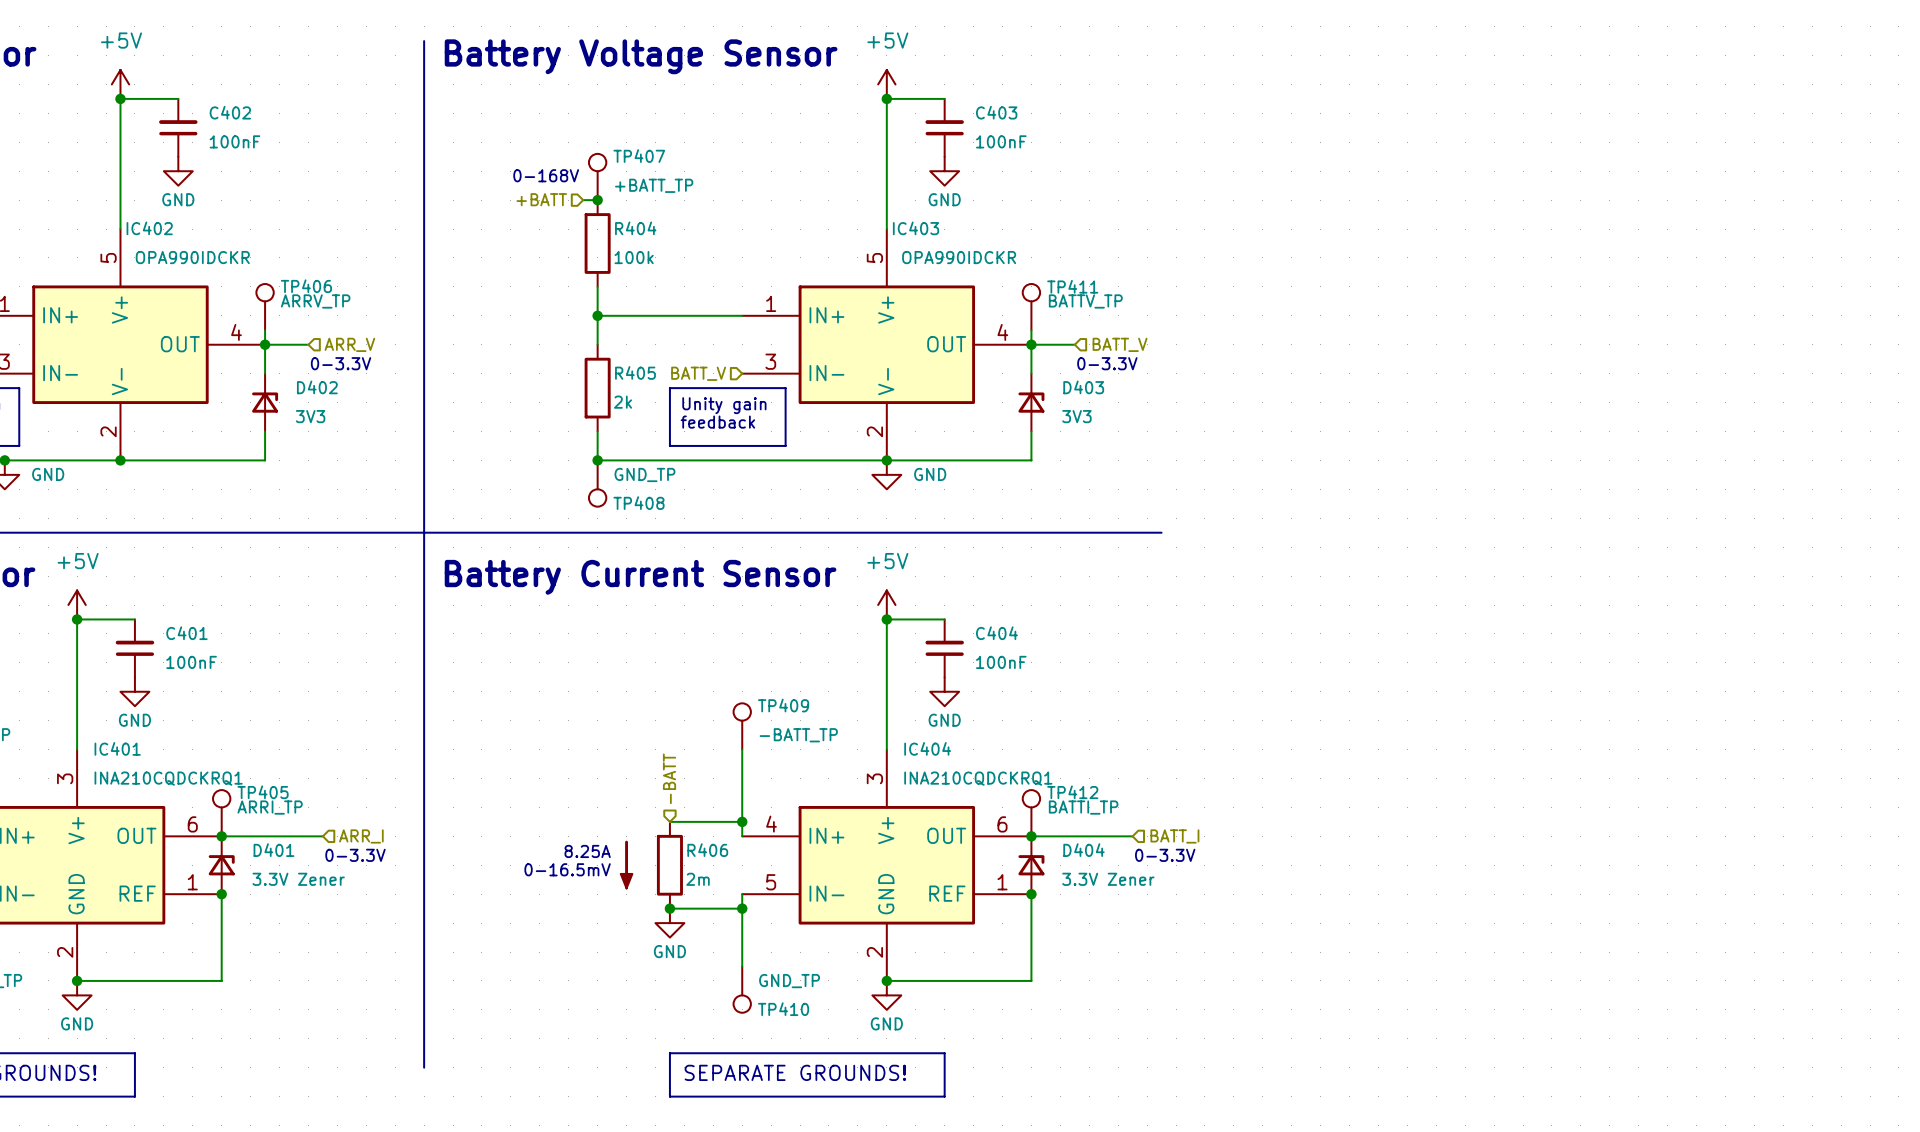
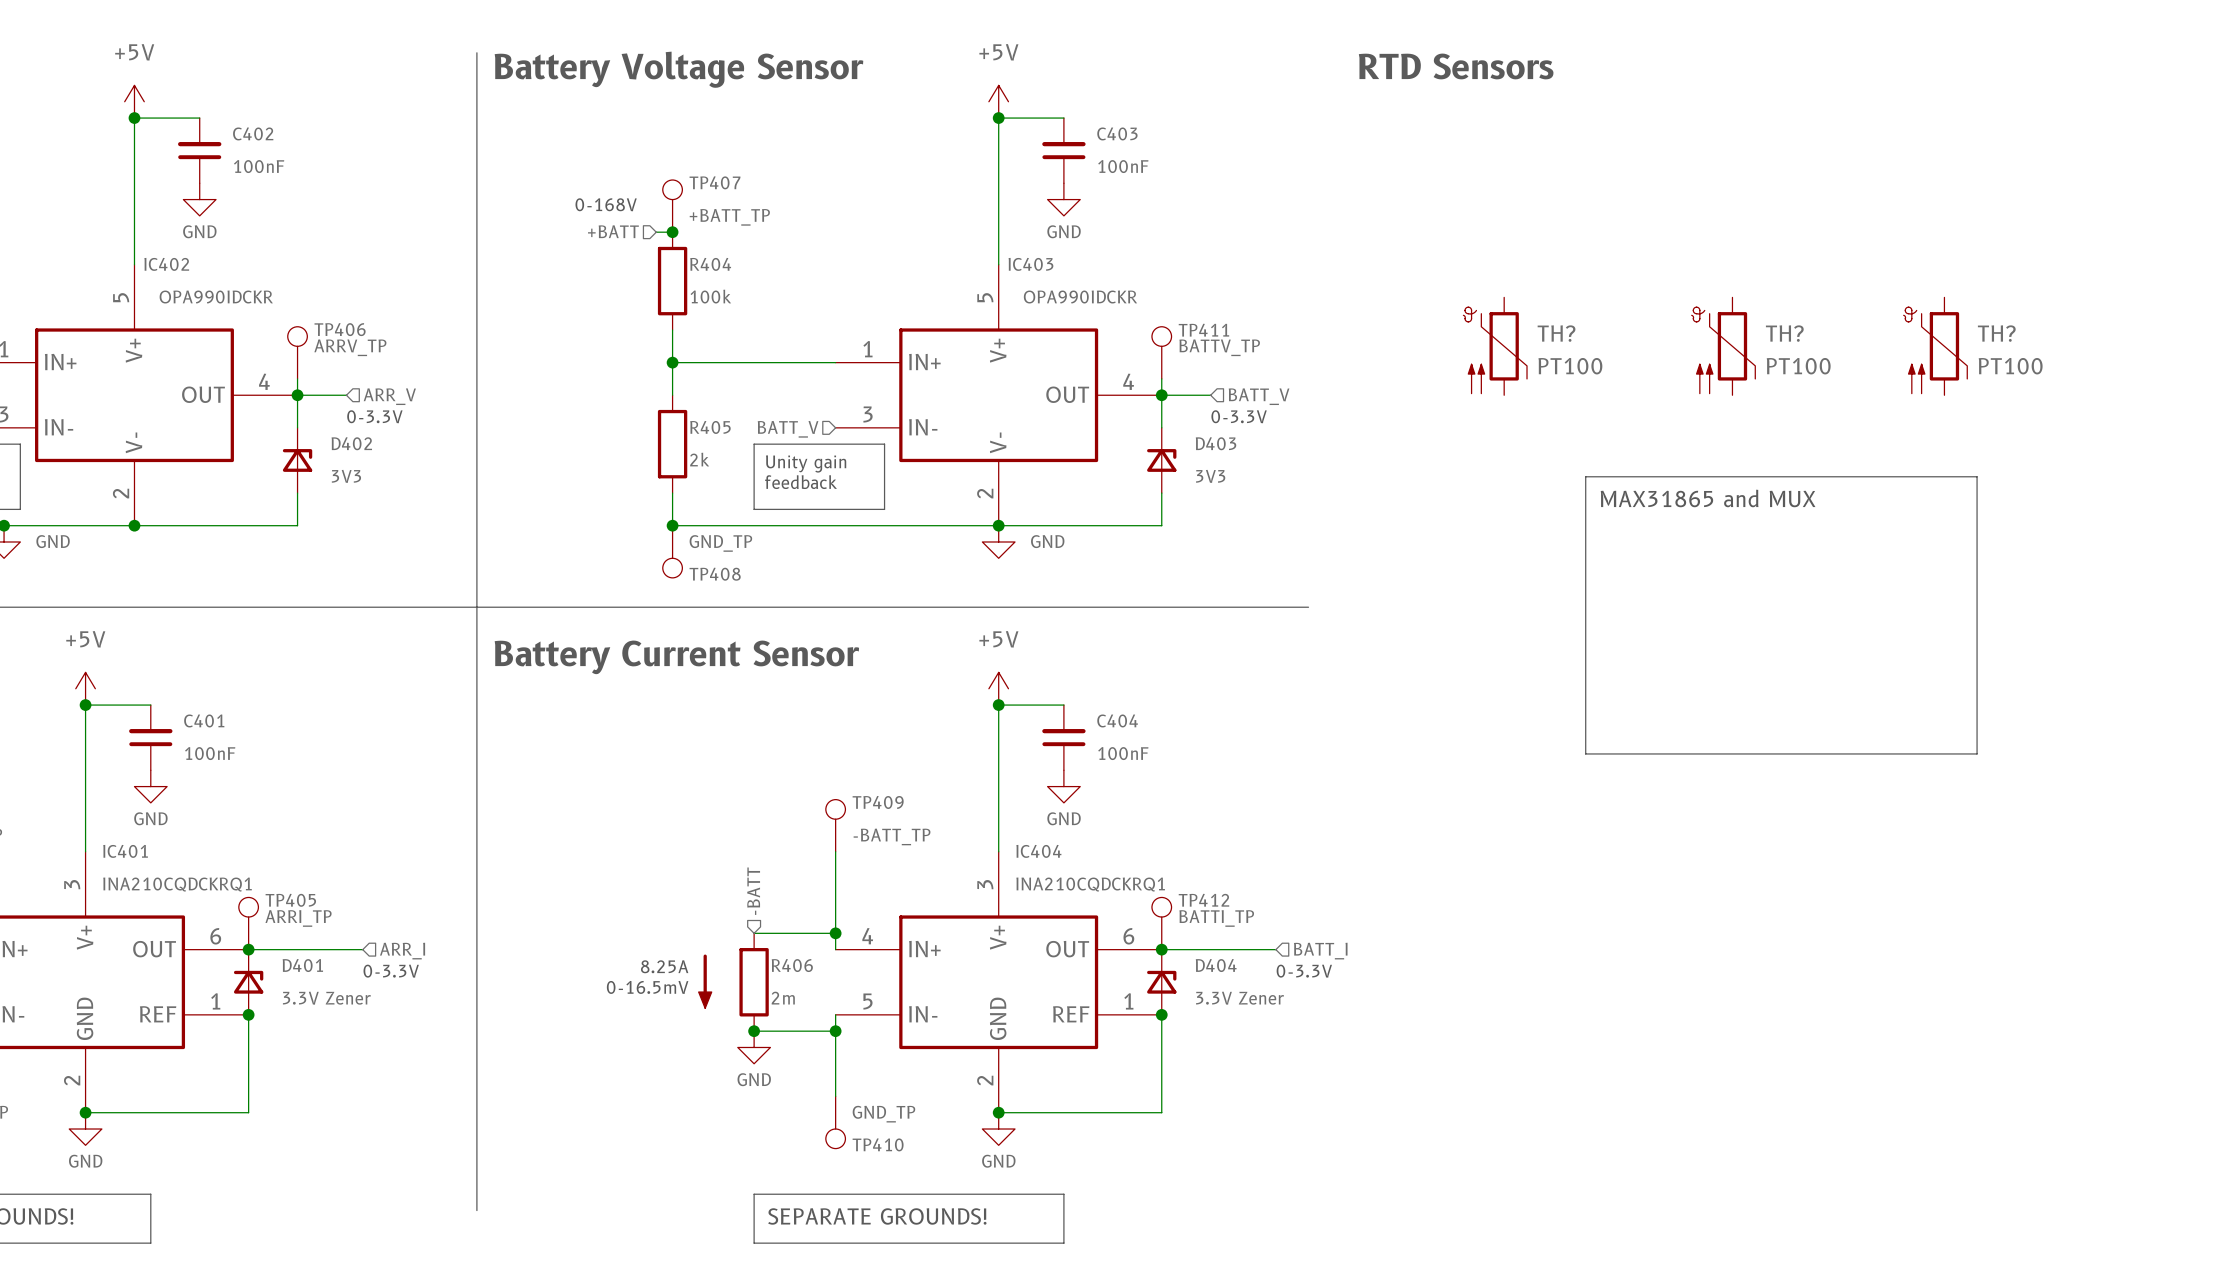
text: none -> RTD Sensors (1456, 66)
TH?: none -> PT100 (1495, 346)
TH?: none -> PT100 (1723, 346)
TH?: none -> PT100 (1935, 346)
line: none -> (1585, 476) (1977, 476) (1977, 753) (1585, 753) (1585, 476)
text: none -> MAX31865 and MUX (1708, 498)

